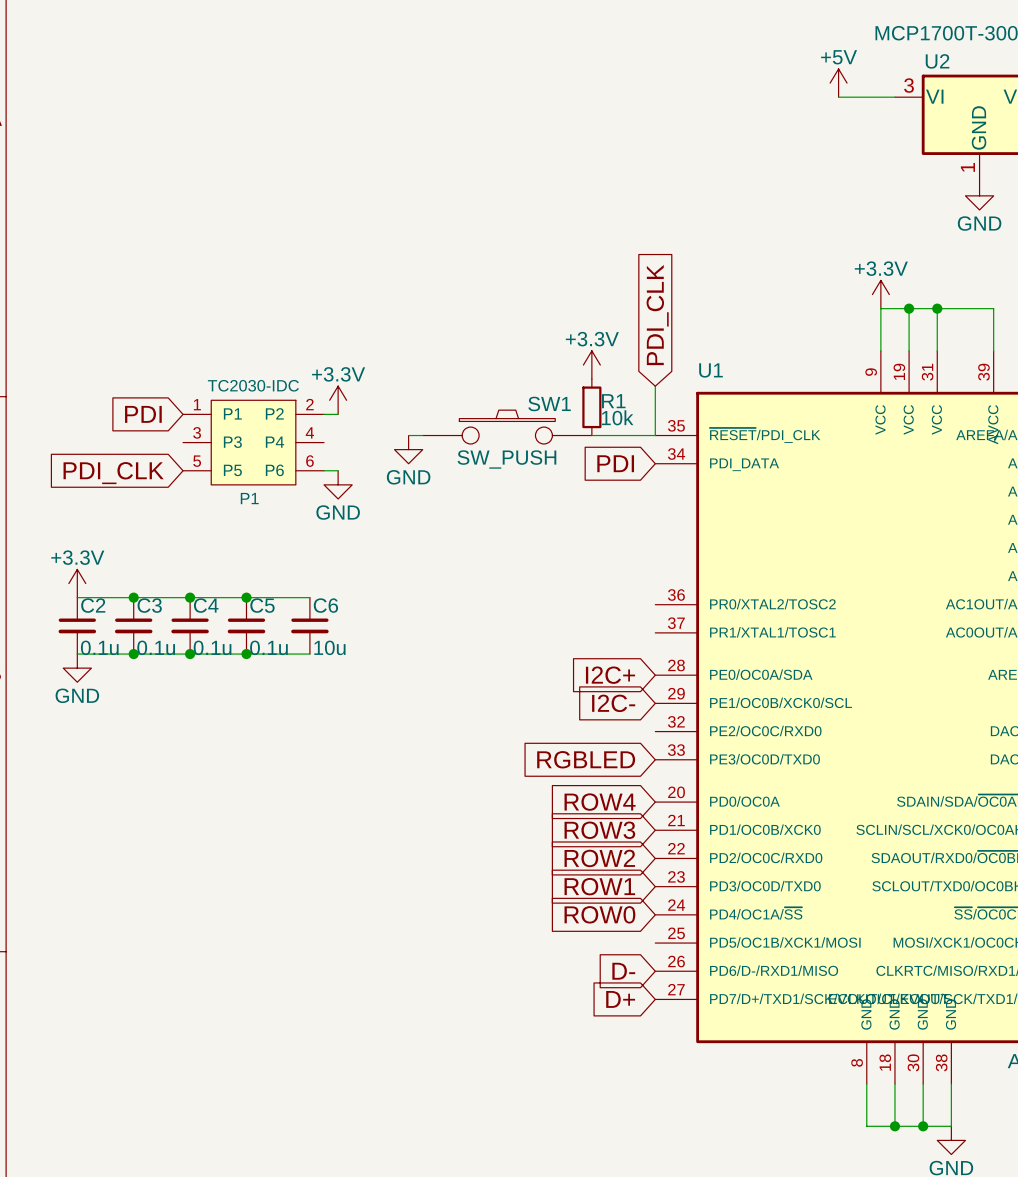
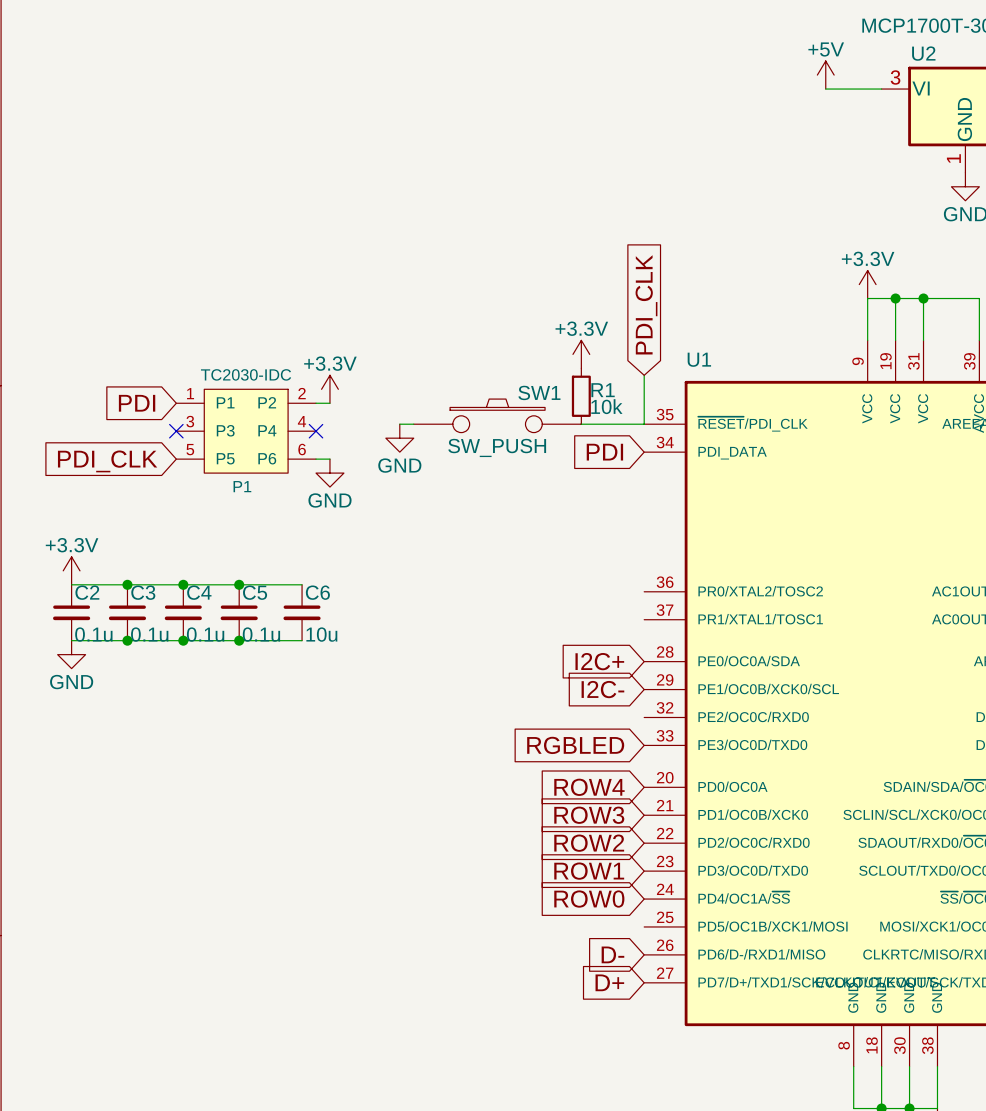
no-connect mark: none -> (176, 431)
no-connect mark: none -> (316, 431)

